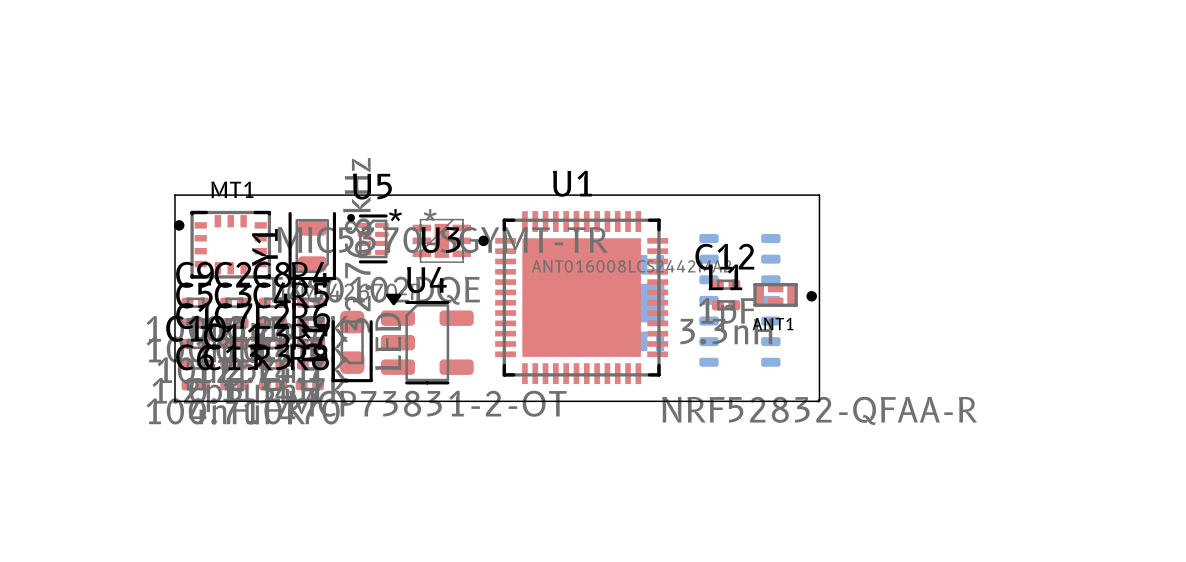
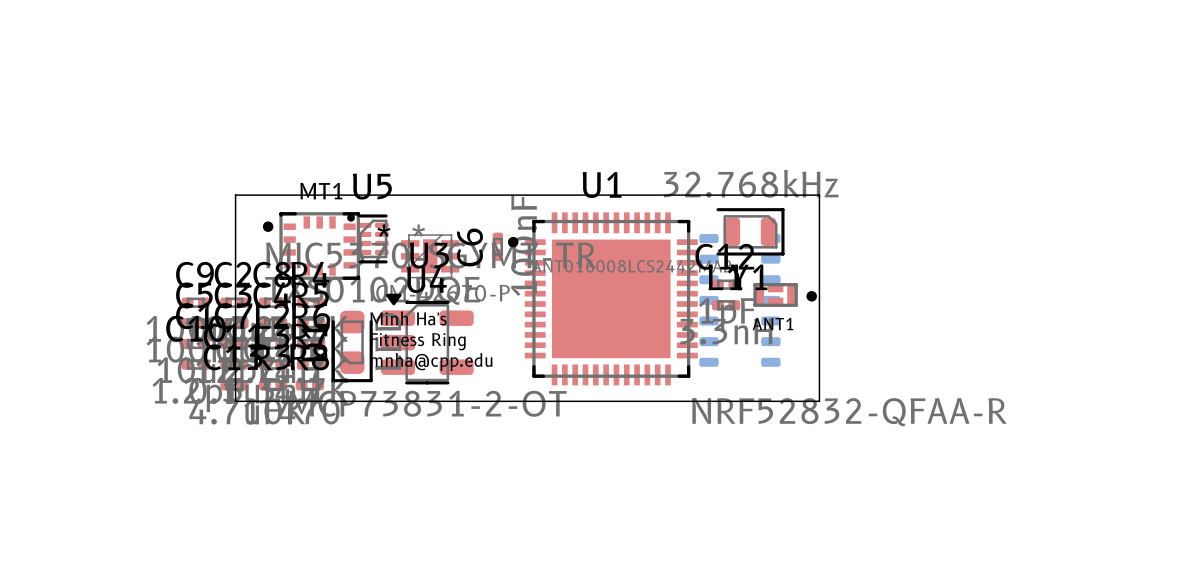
board edge: (235, 195) (175, 195) (175, 401) (235, 401) -> (235, 195) (235, 401)
U3 position: (441, 240) -> (430, 256)
MT1 position: (222, 244) -> (311, 246)
Y1 rotation: 0° (312, 246) -> 90° counterclockwise (750, 231)
Y1 position: (312, 246) -> (750, 231)
U1 position: (573, 297) -> (602, 298)
text: none -> Minh Ha's (408, 318)
text: none -> Fitness Ring (417, 341)
text: none -> mnha@cpp.edu (431, 362)
C6 rotation: 0° (195, 385) -> 90° clockwise (497, 246)
C6 position: (195, 385) -> (497, 246)

